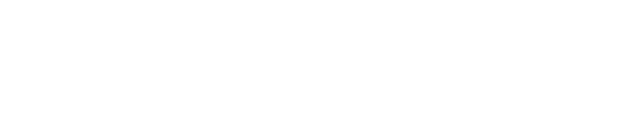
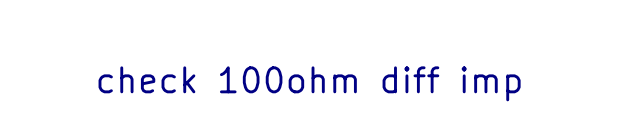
text: none -> check 100ohm diff imp (309, 83)

